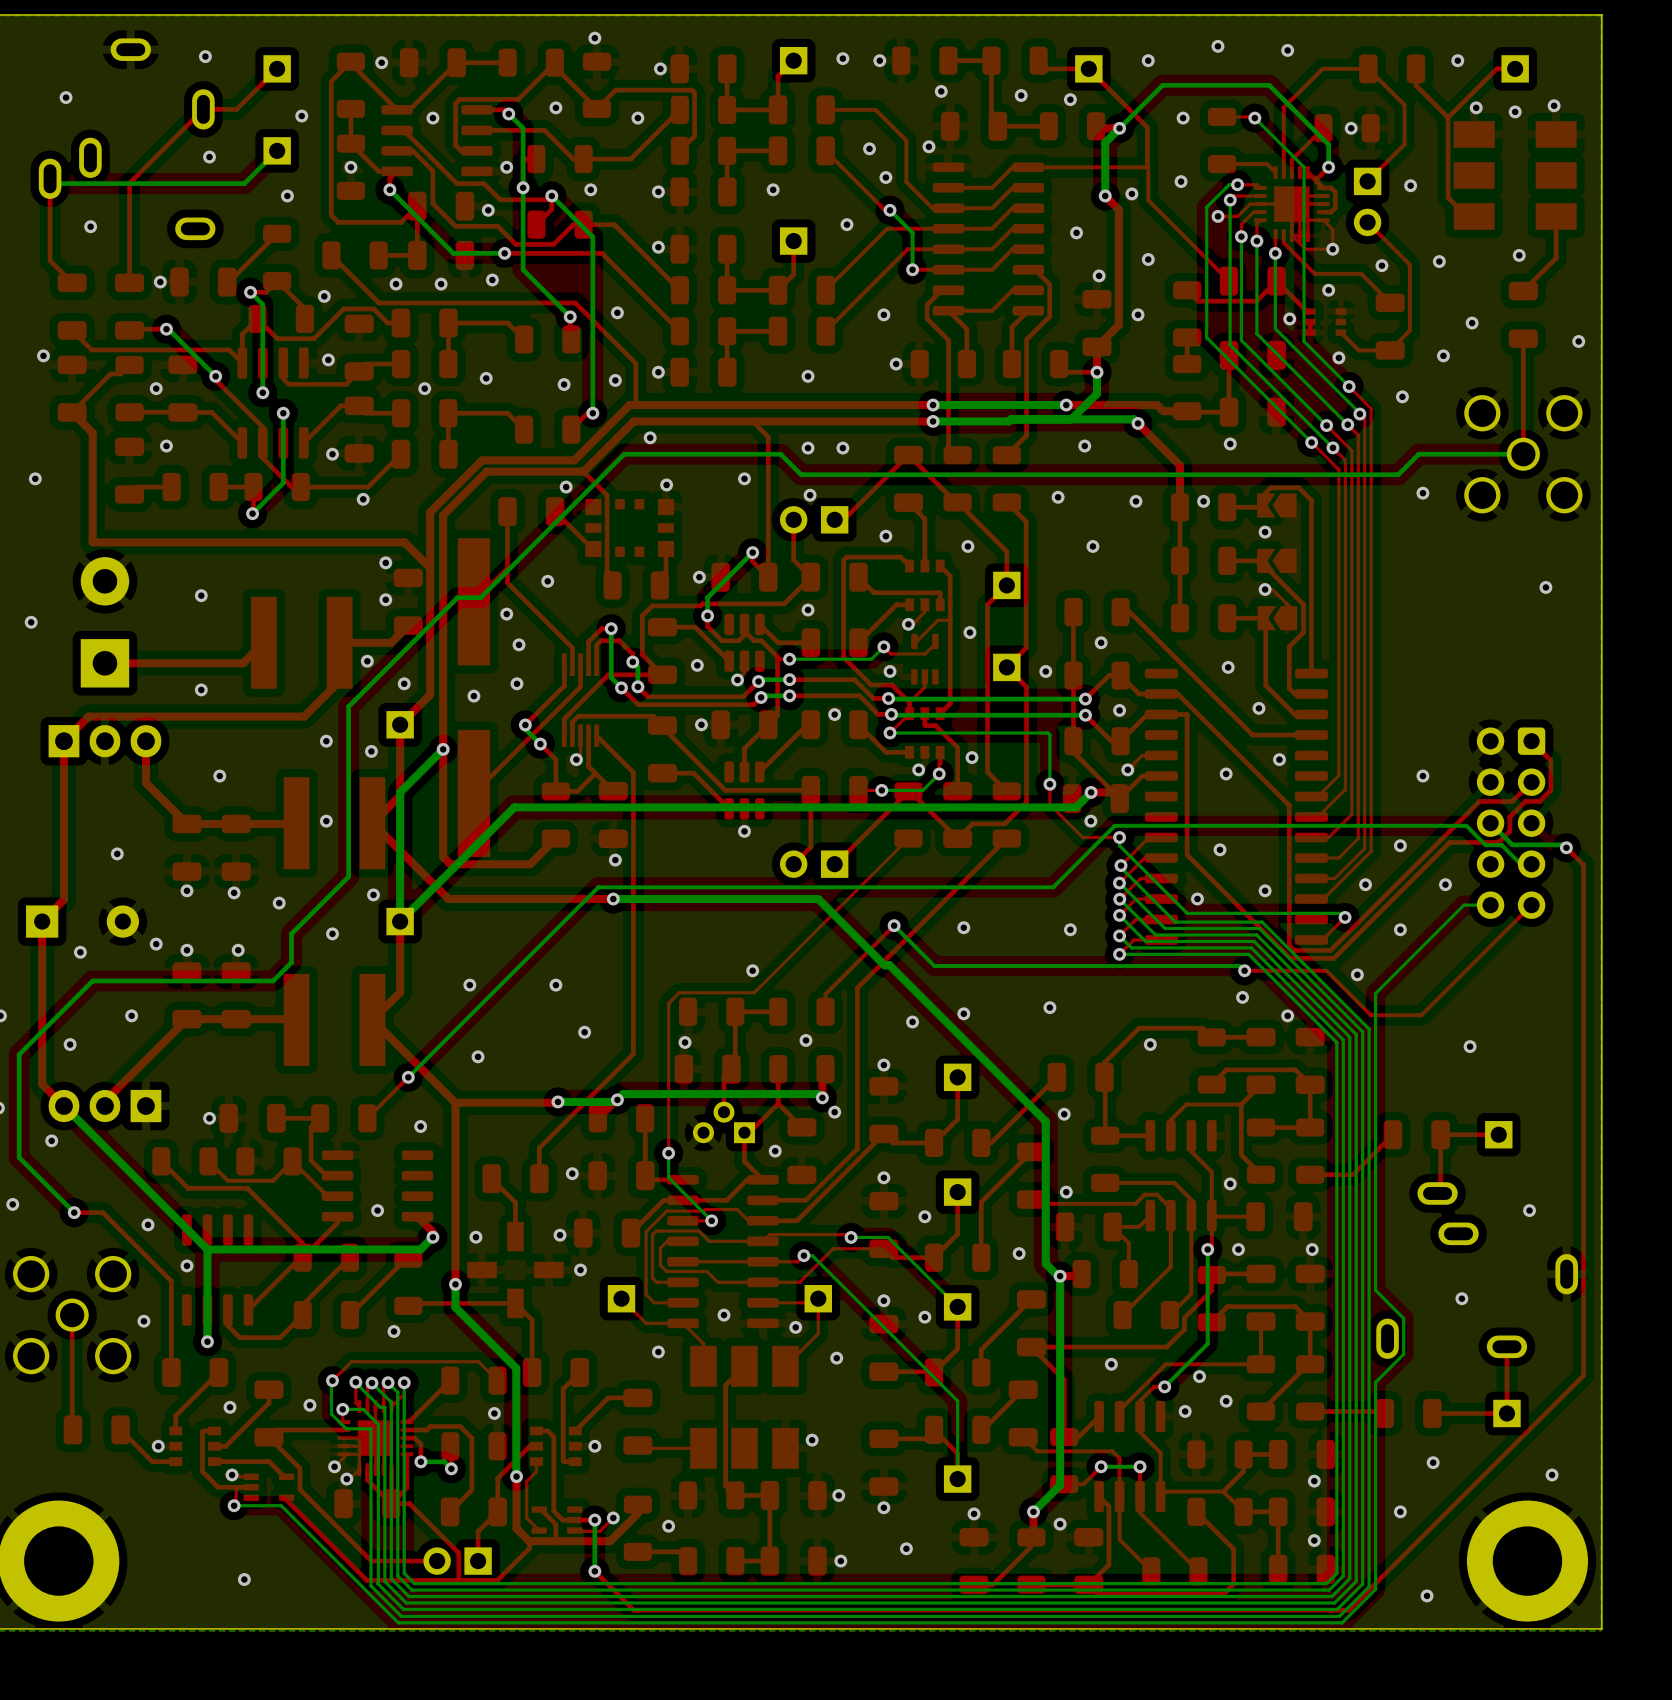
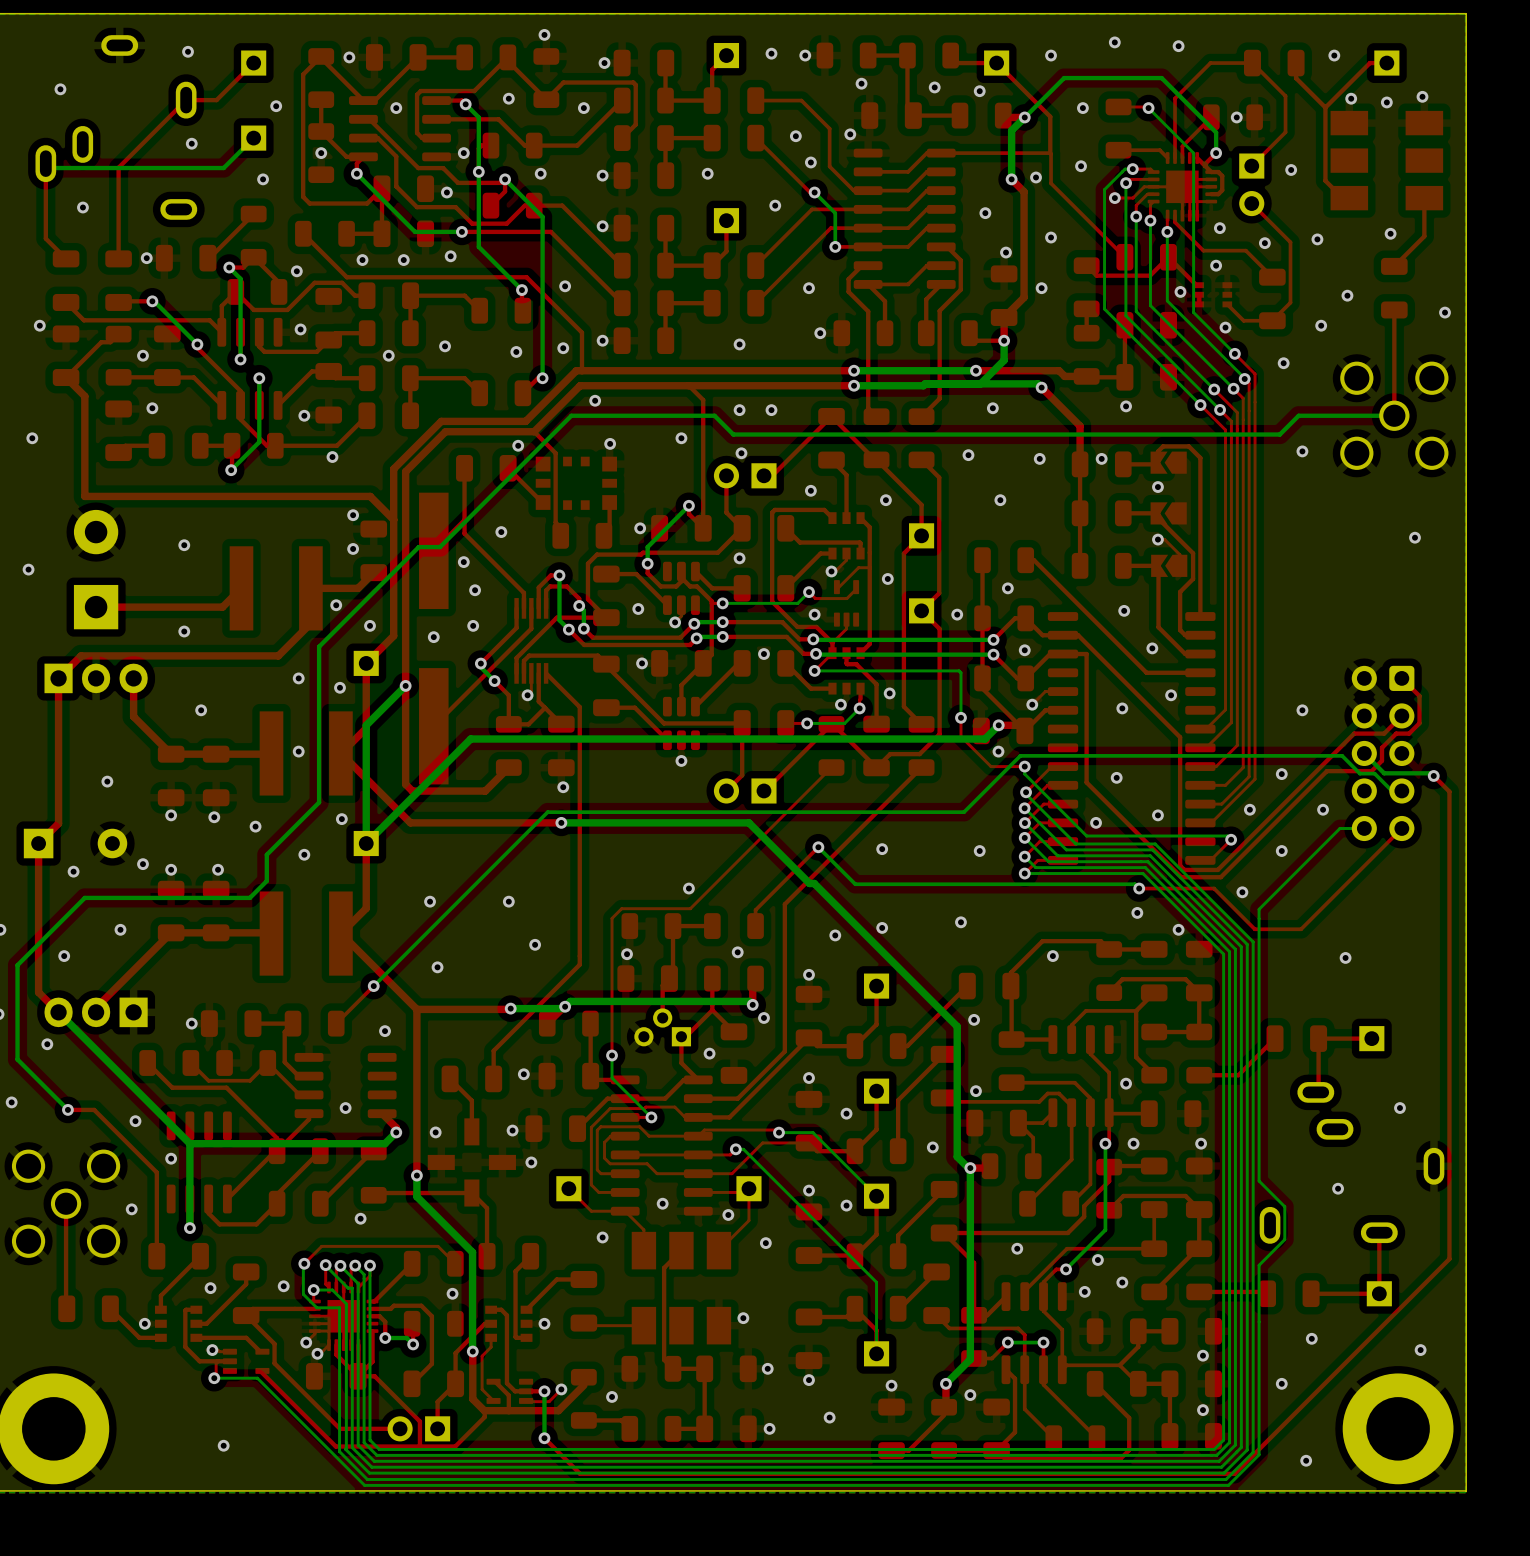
top track: (1323, 220) (1332, 229) (1332, 249) (1305, 249) (1291, 235) (1307, 235) -> none

